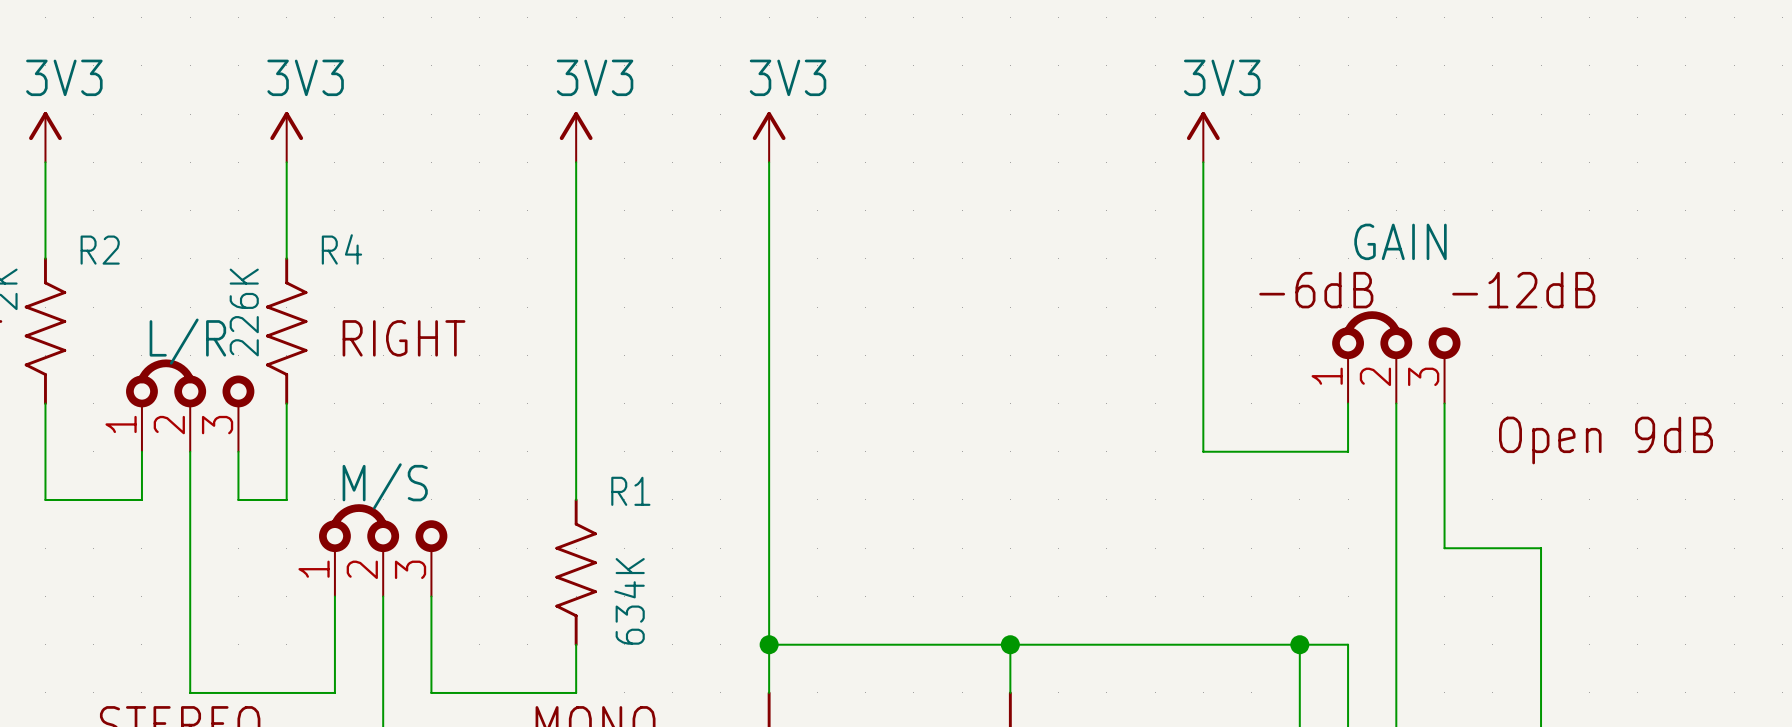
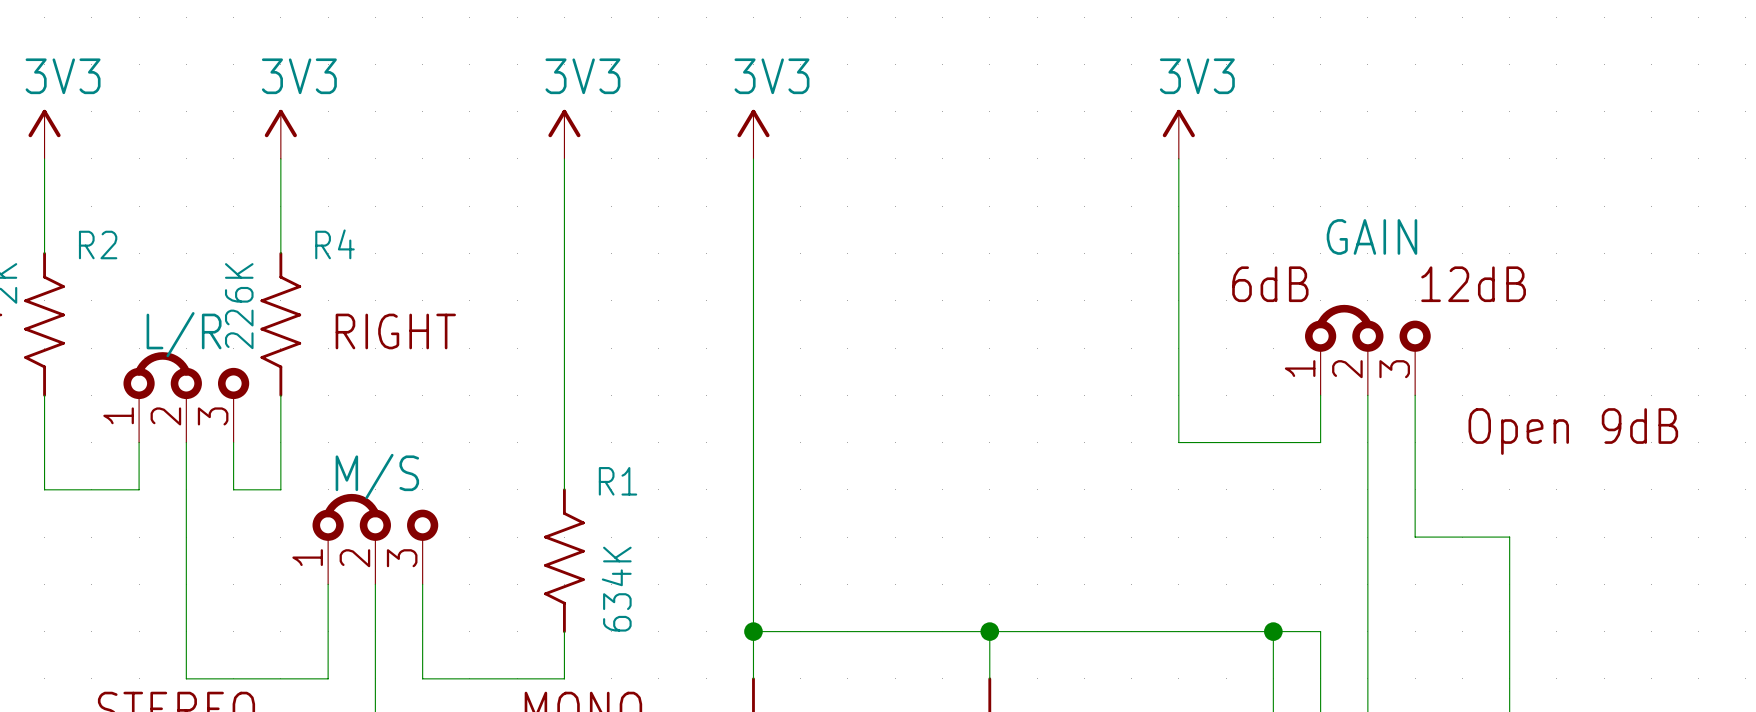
text: -6dB (1316, 290) -> 6dB (1270, 284)
text: -12dB (1523, 290) -> 12dB (1473, 284)

